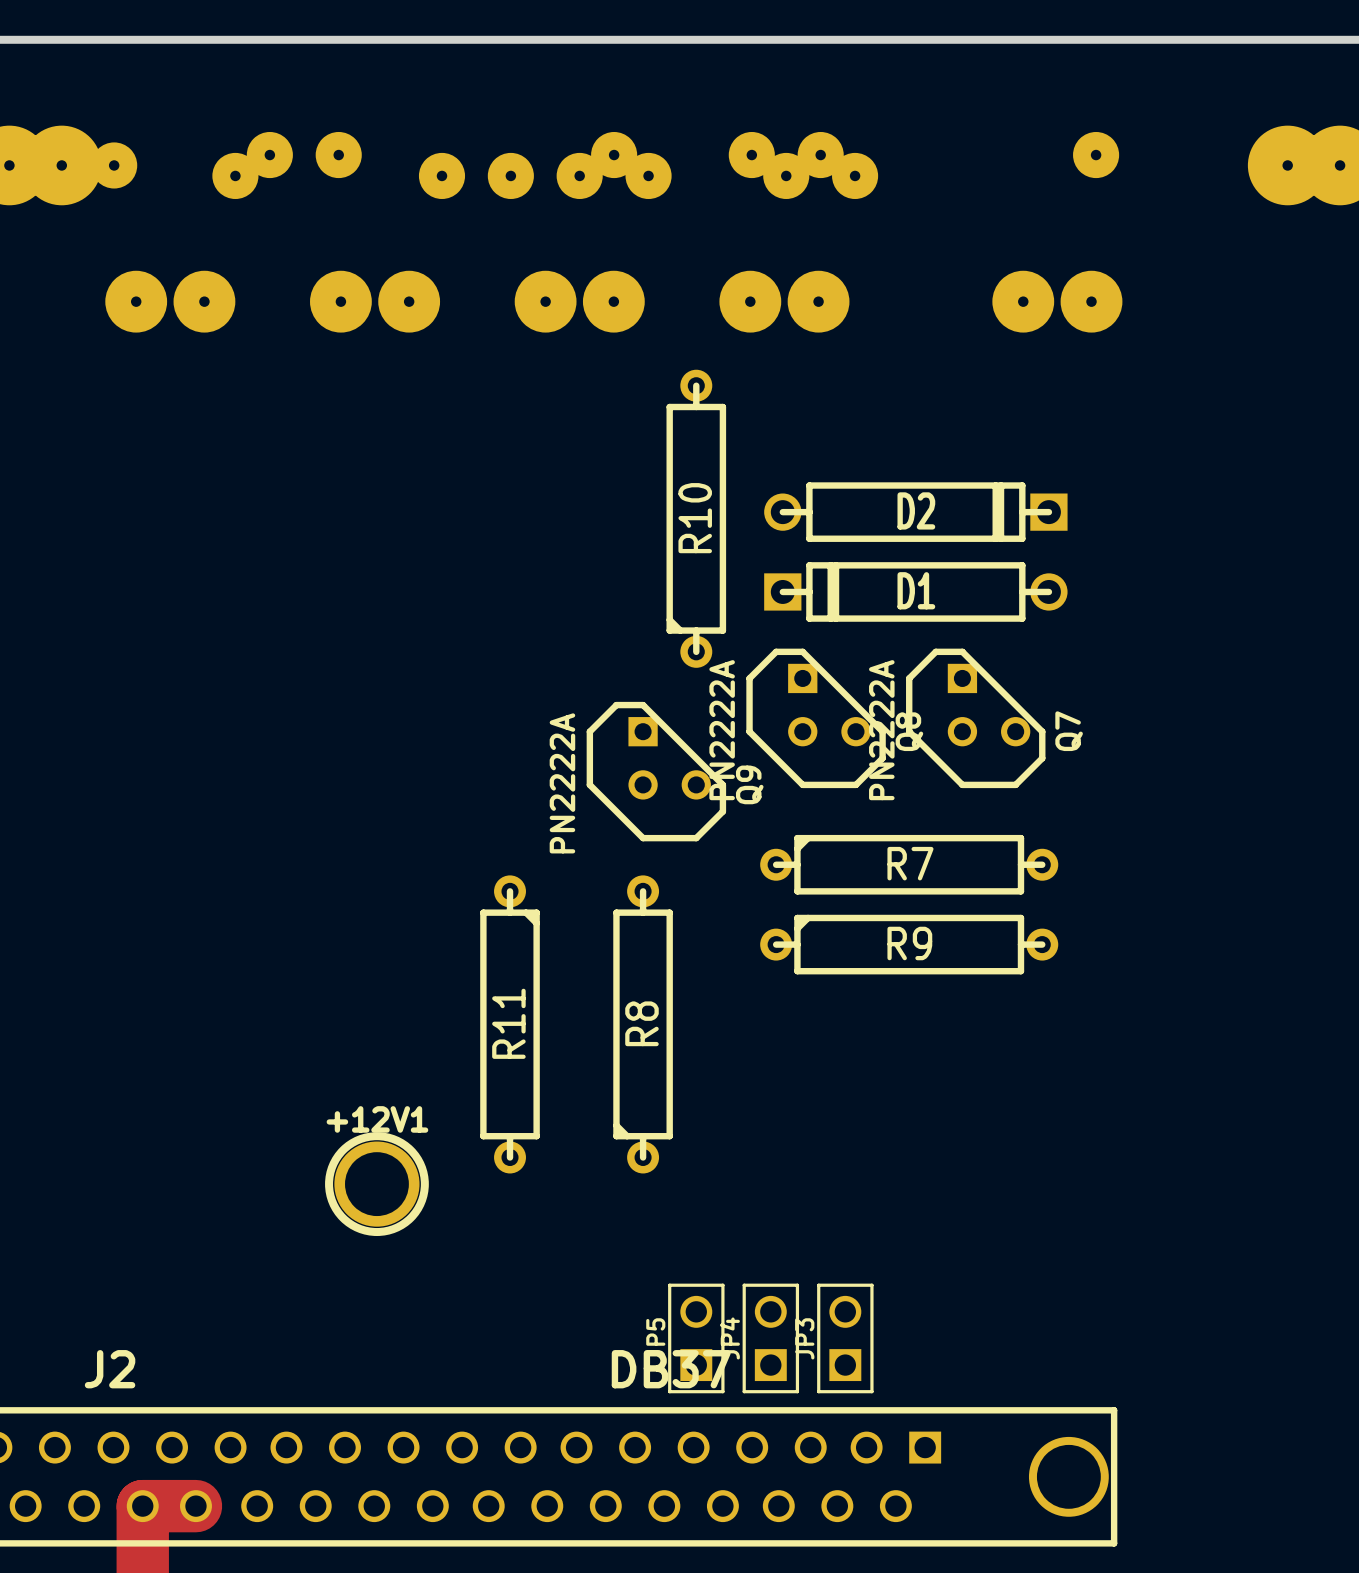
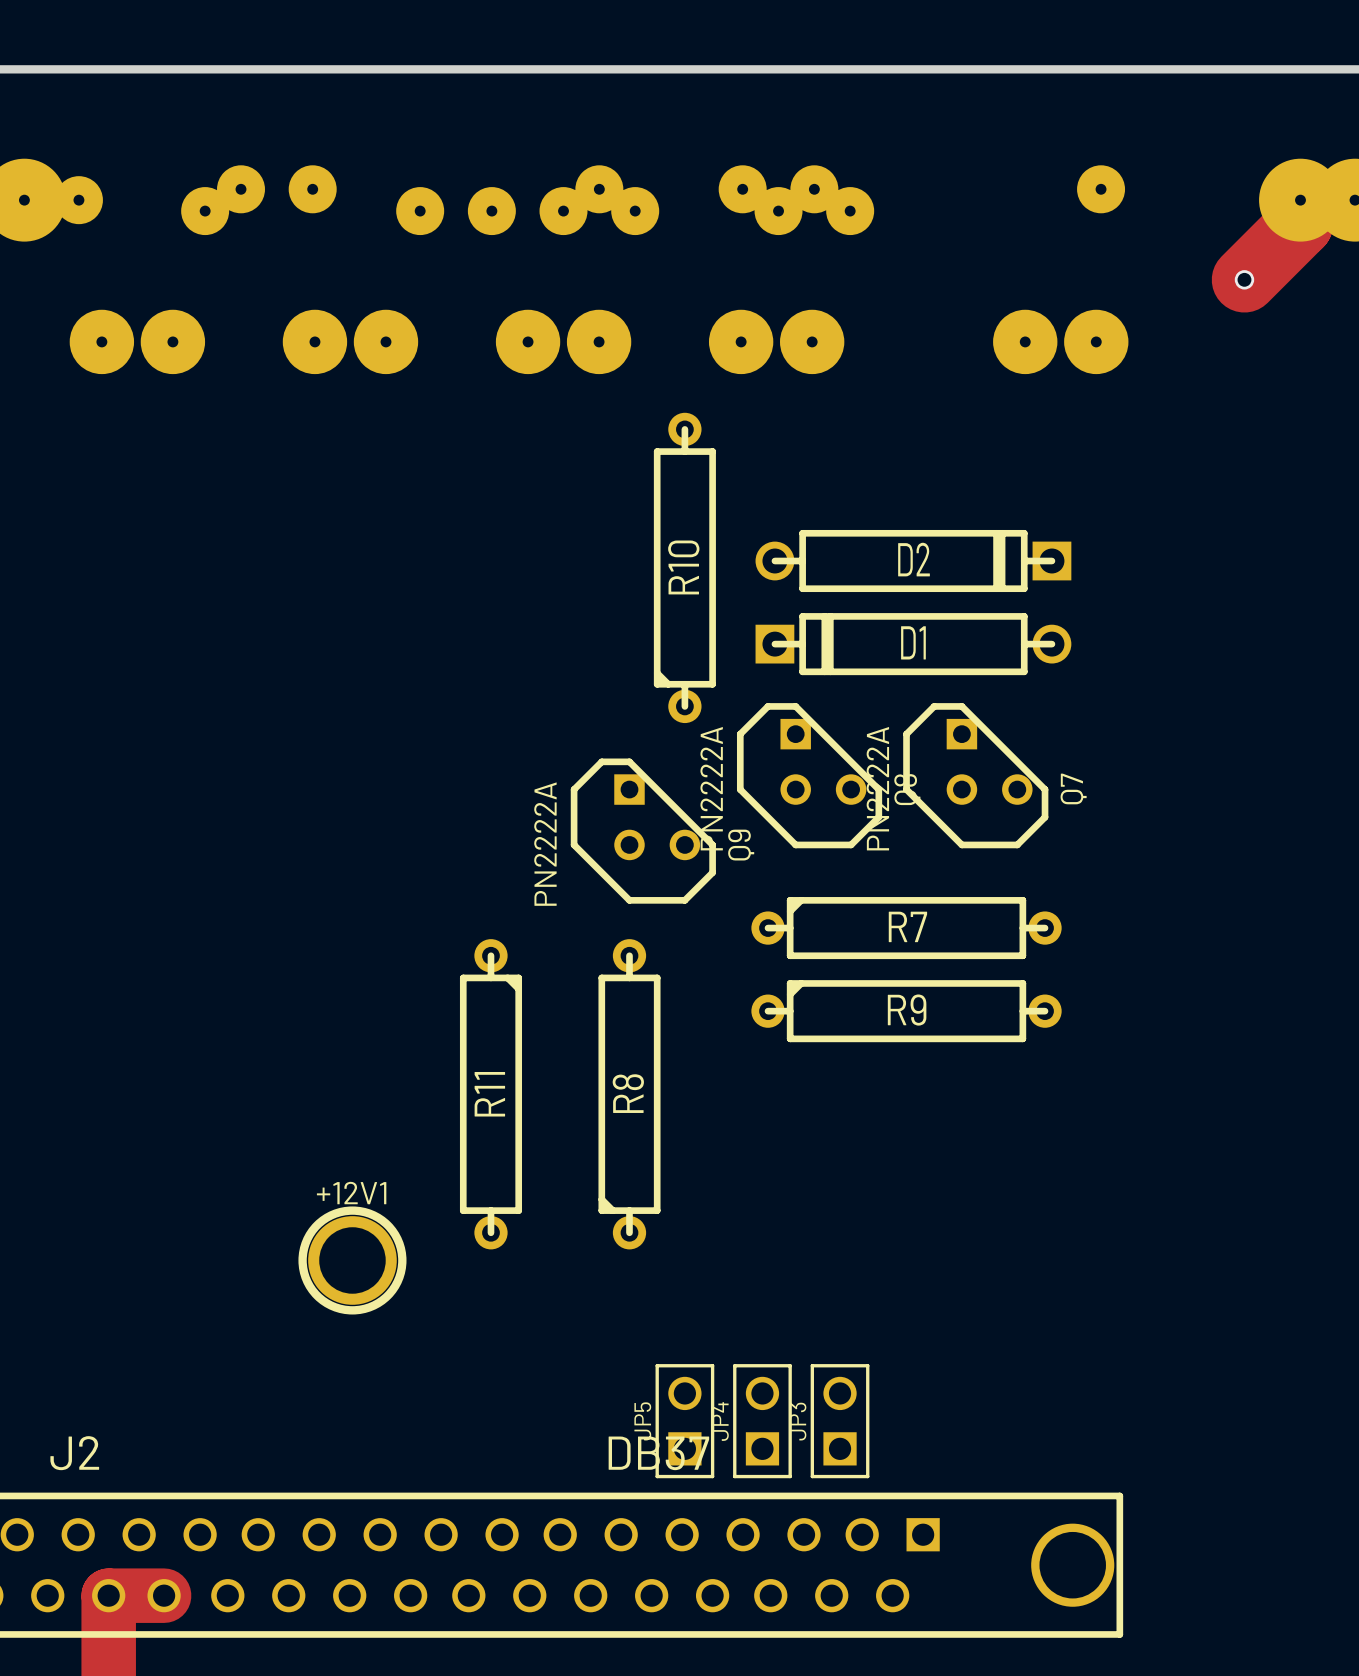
track: none -> (1300, 200) (1300, 223) (1244, 279)
via: none -> (1244, 279)

